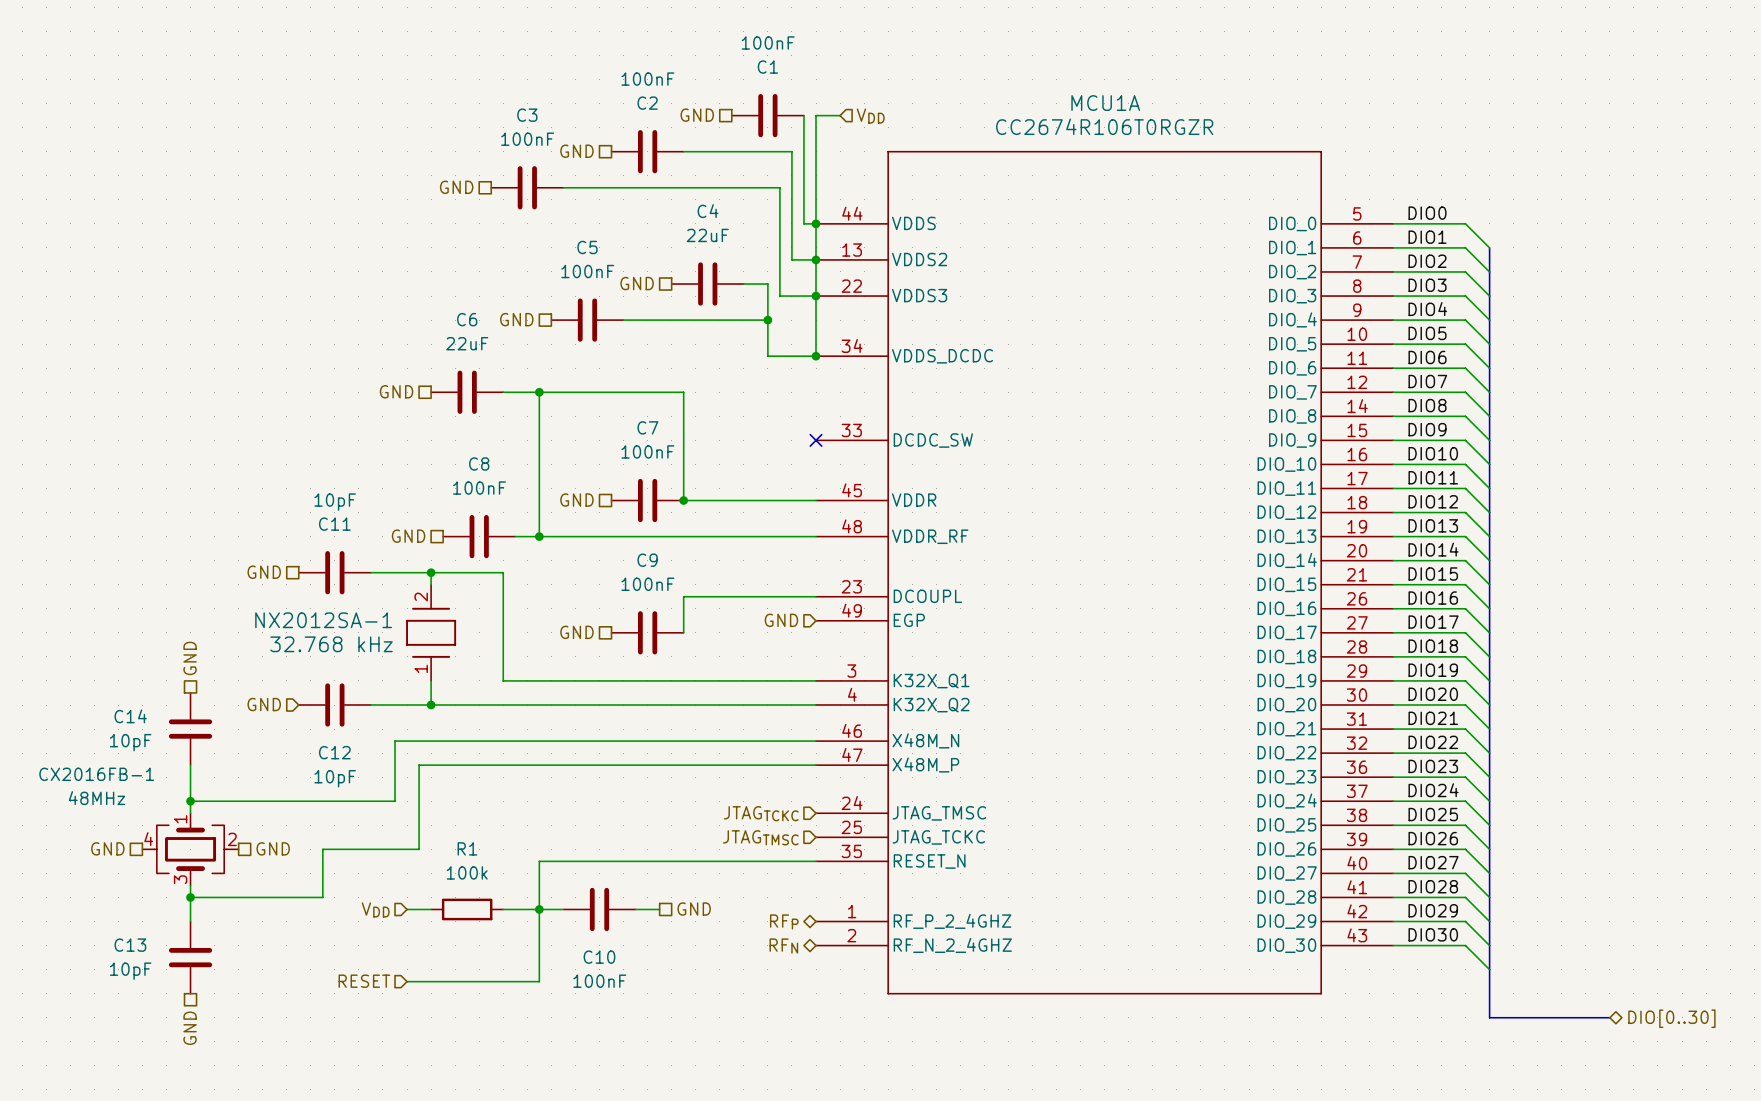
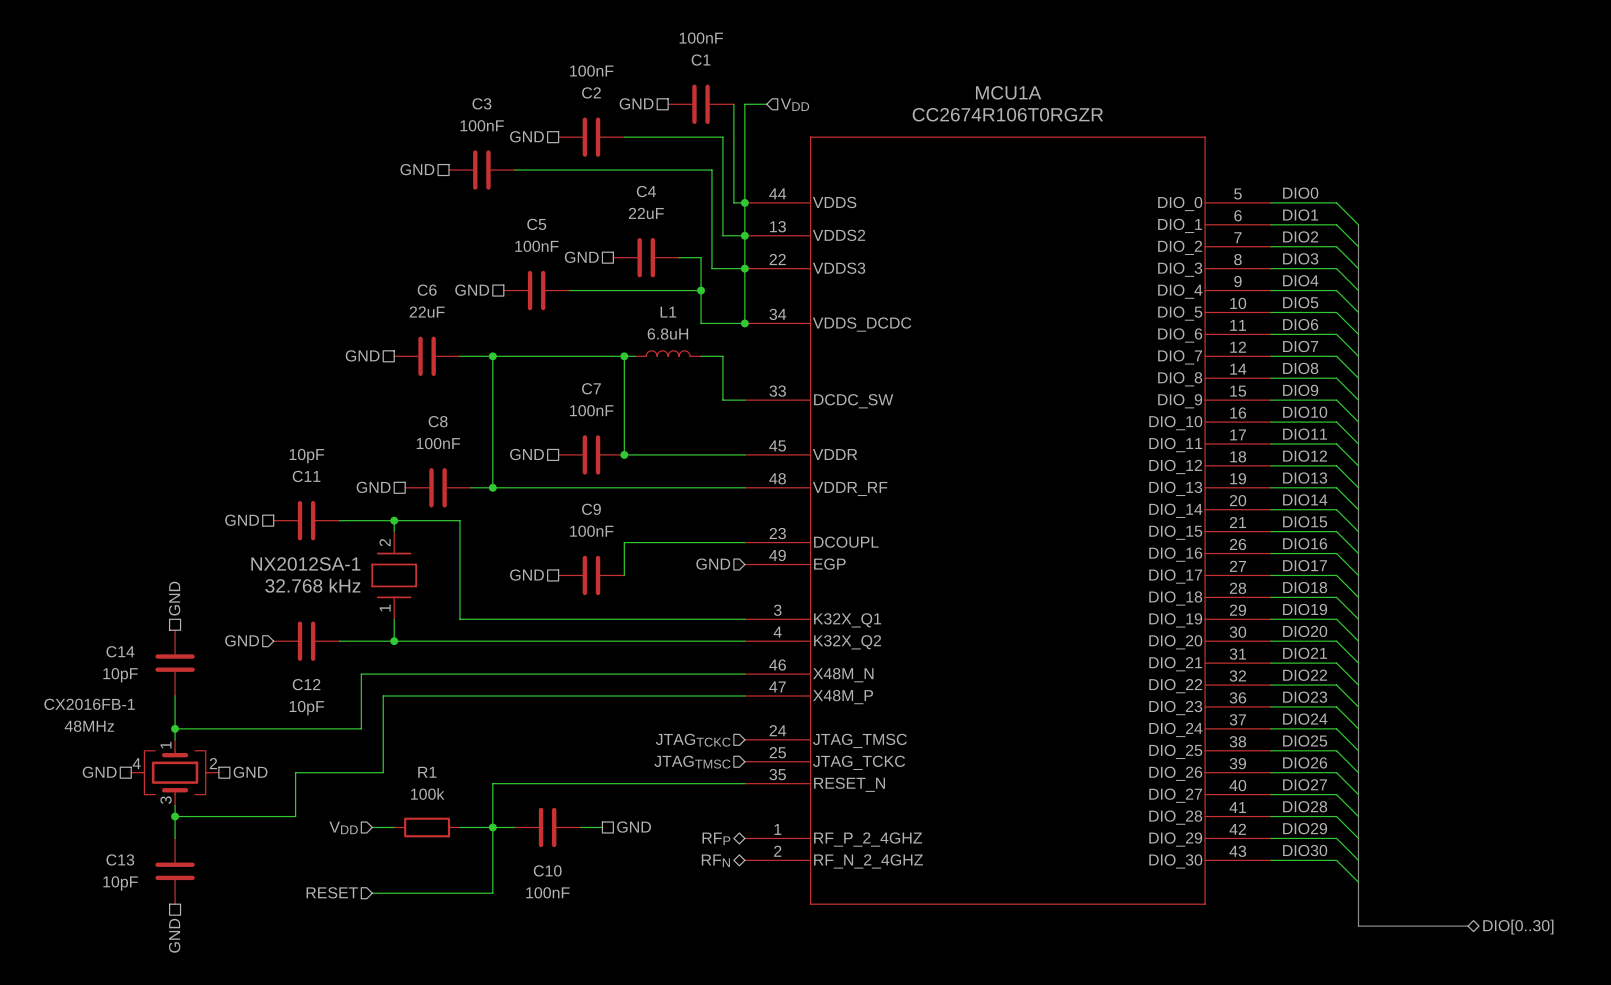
L1: none -> 6.8uH (668, 353)
wire: none -> (624, 356) (635, 356)
junction: none -> (624, 356)
wire: none -> (701, 356) (722, 356) (722, 400) (744, 400)
no-connect mark: (816, 440) -> none

